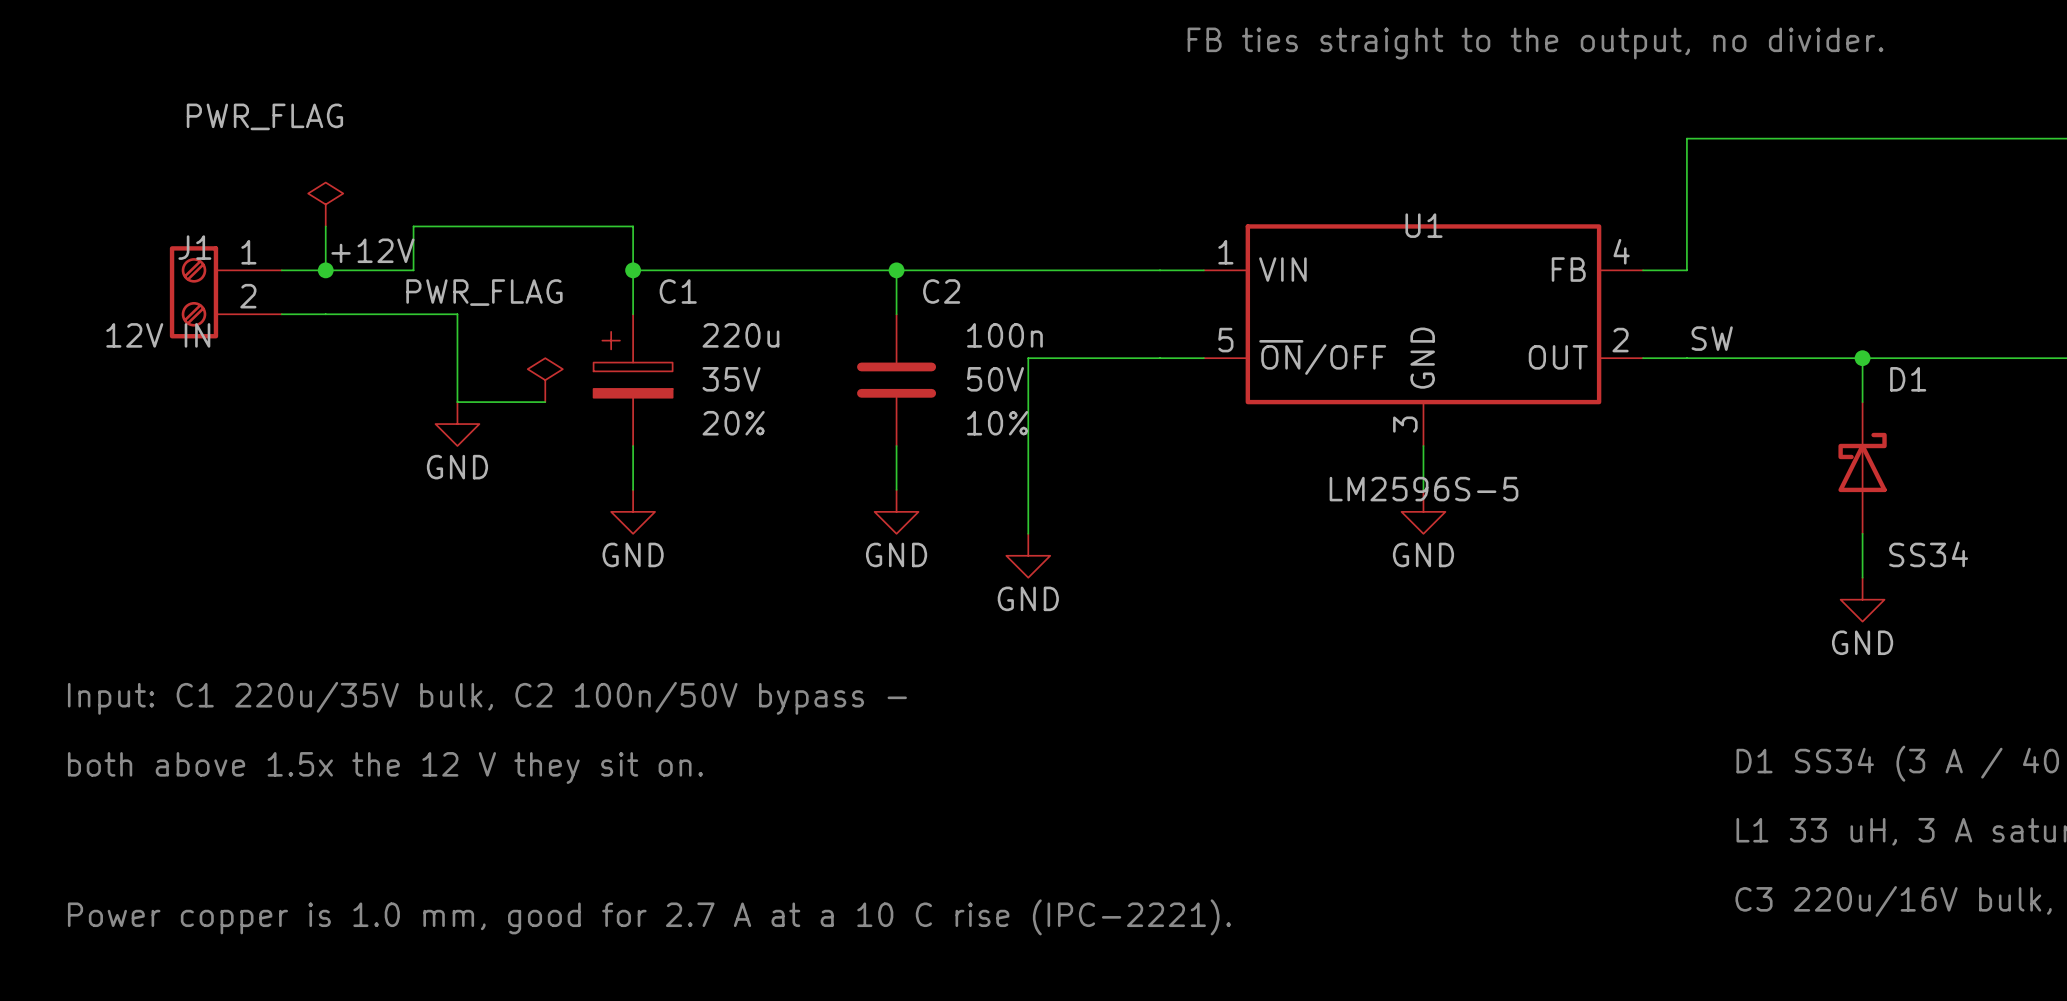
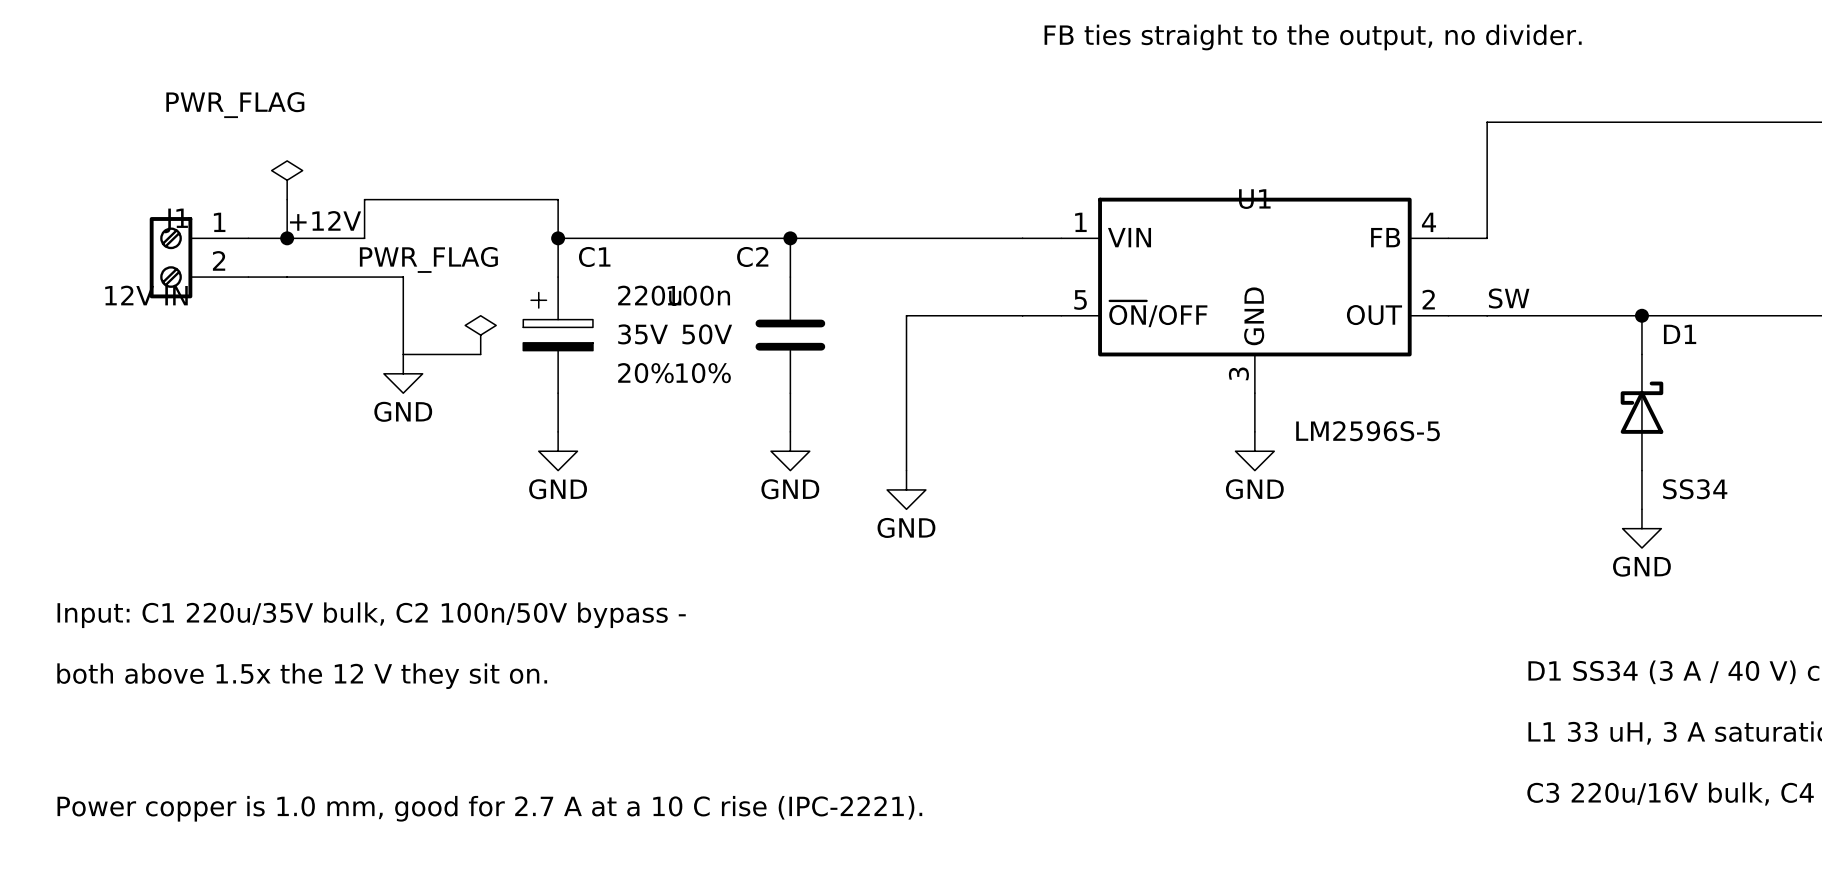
C2 name position: C2 (941, 291) -> C2 (752, 256)
C2 value position: 100n (1004, 335) -> 100n (698, 295)
C2 text position: 50V (995, 379) -> 50V (707, 334)
C2 text position: 10% (997, 423) -> 10% (703, 373)
U1 value position: LM2596S-5 (1423, 489) -> LM2596S-5 (1368, 431)

